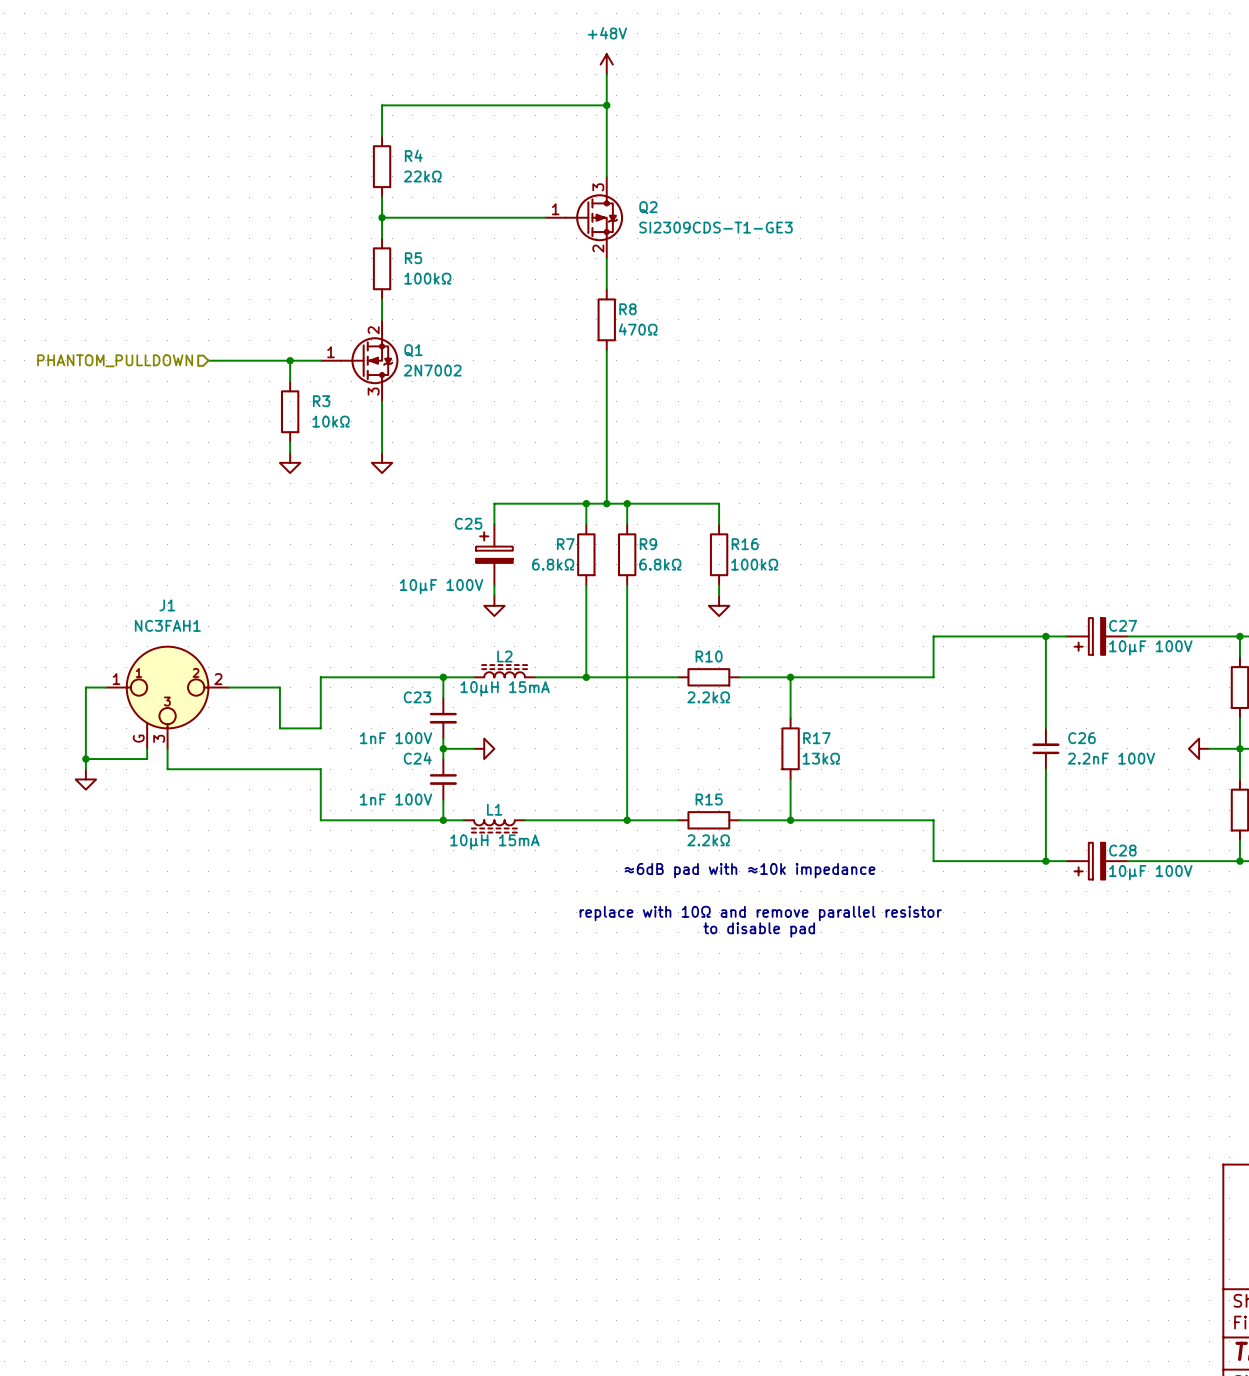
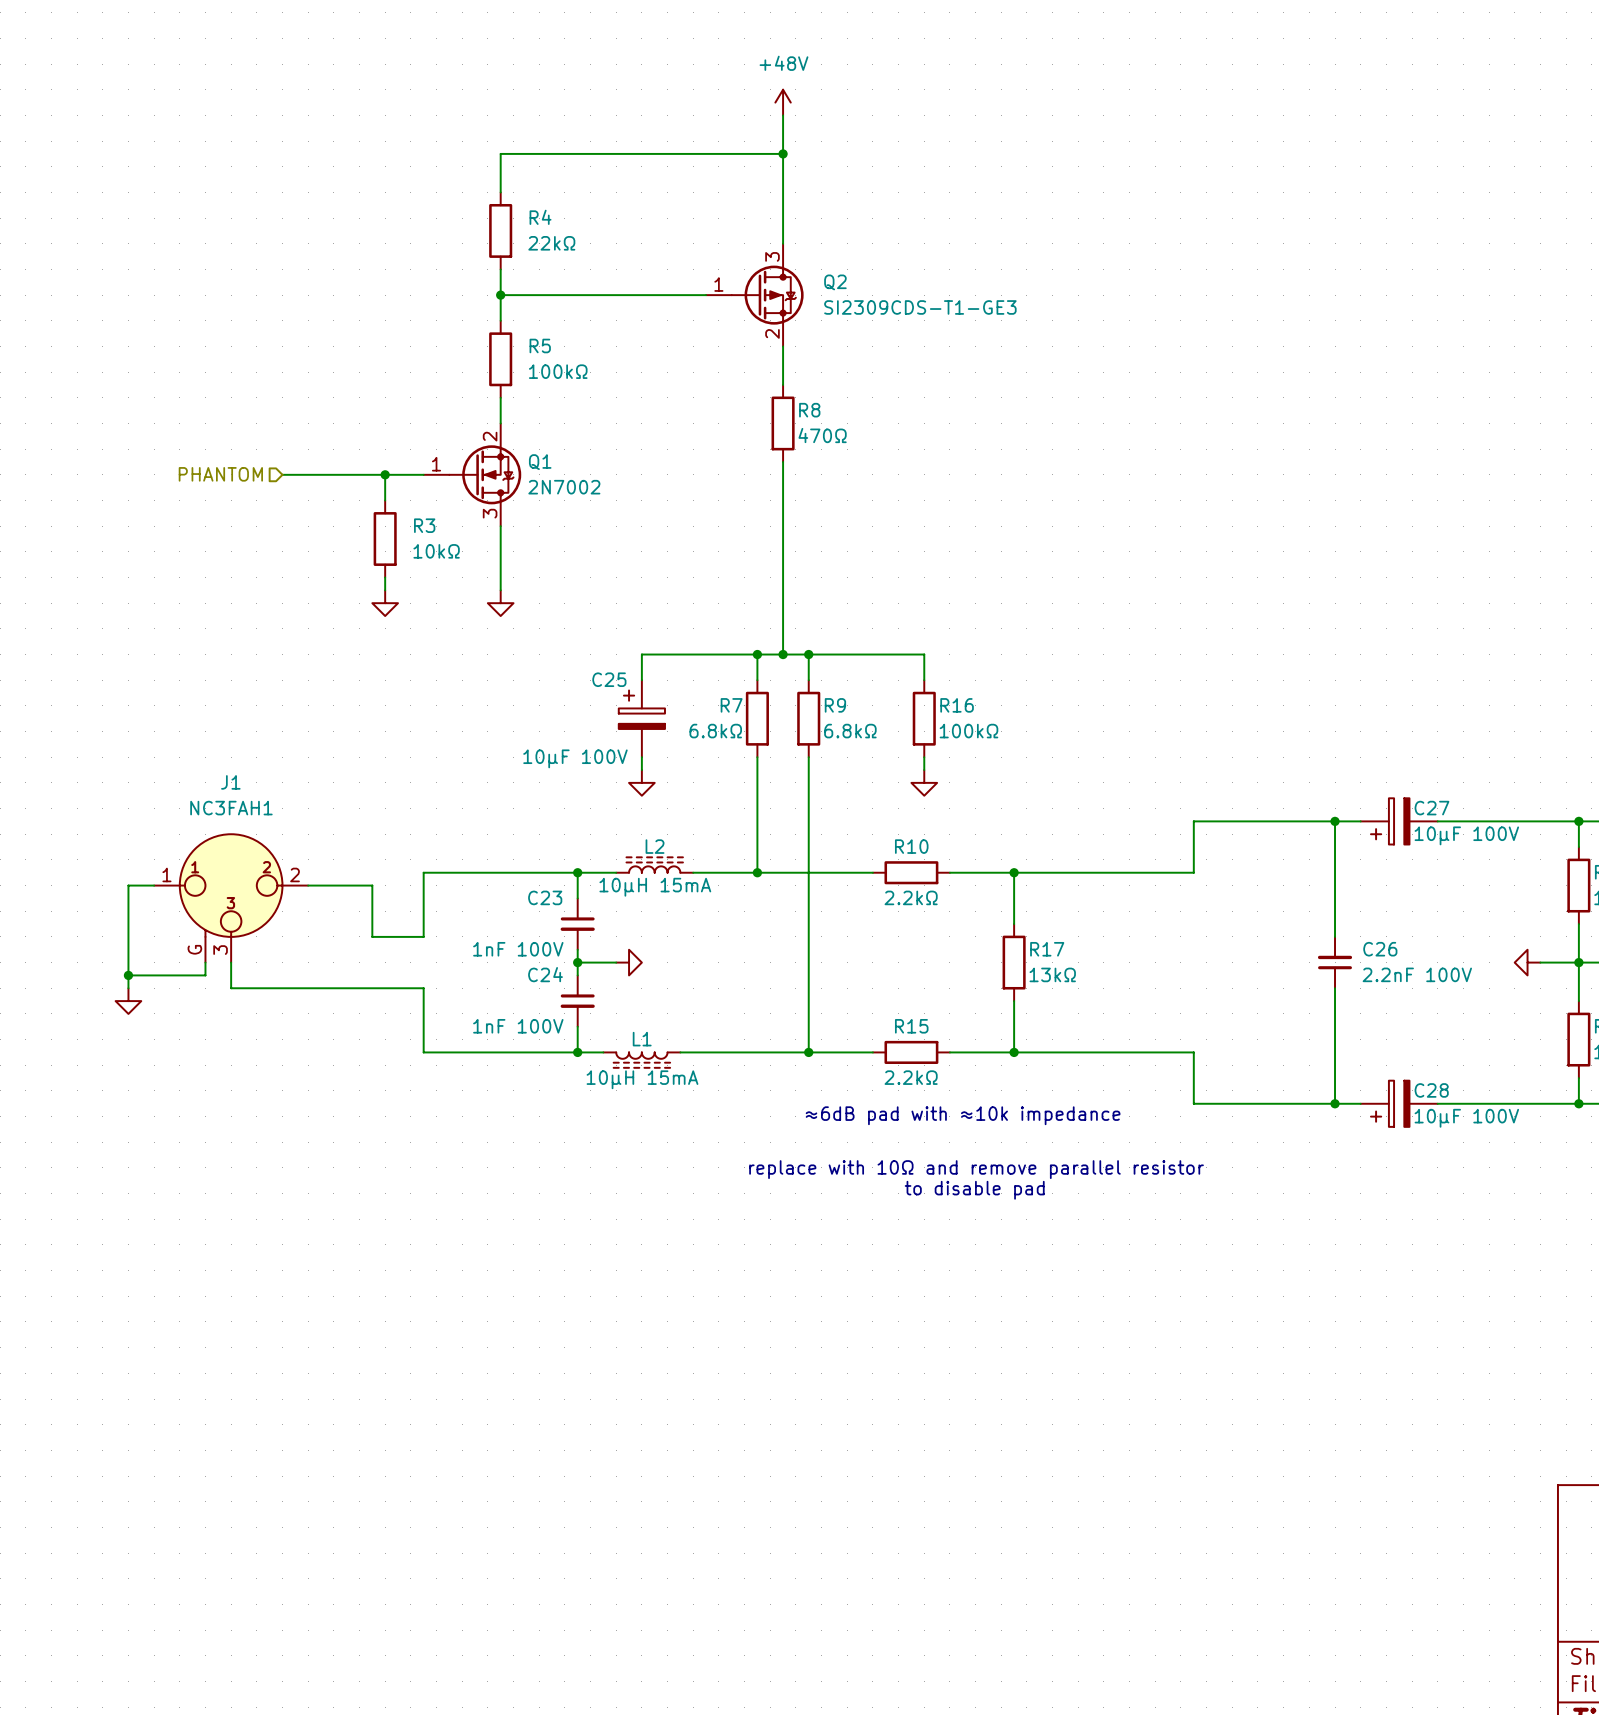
hierarchical label: PHANTOM_PULLDOWN (115, 360) -> PHANTOM (220, 474)

